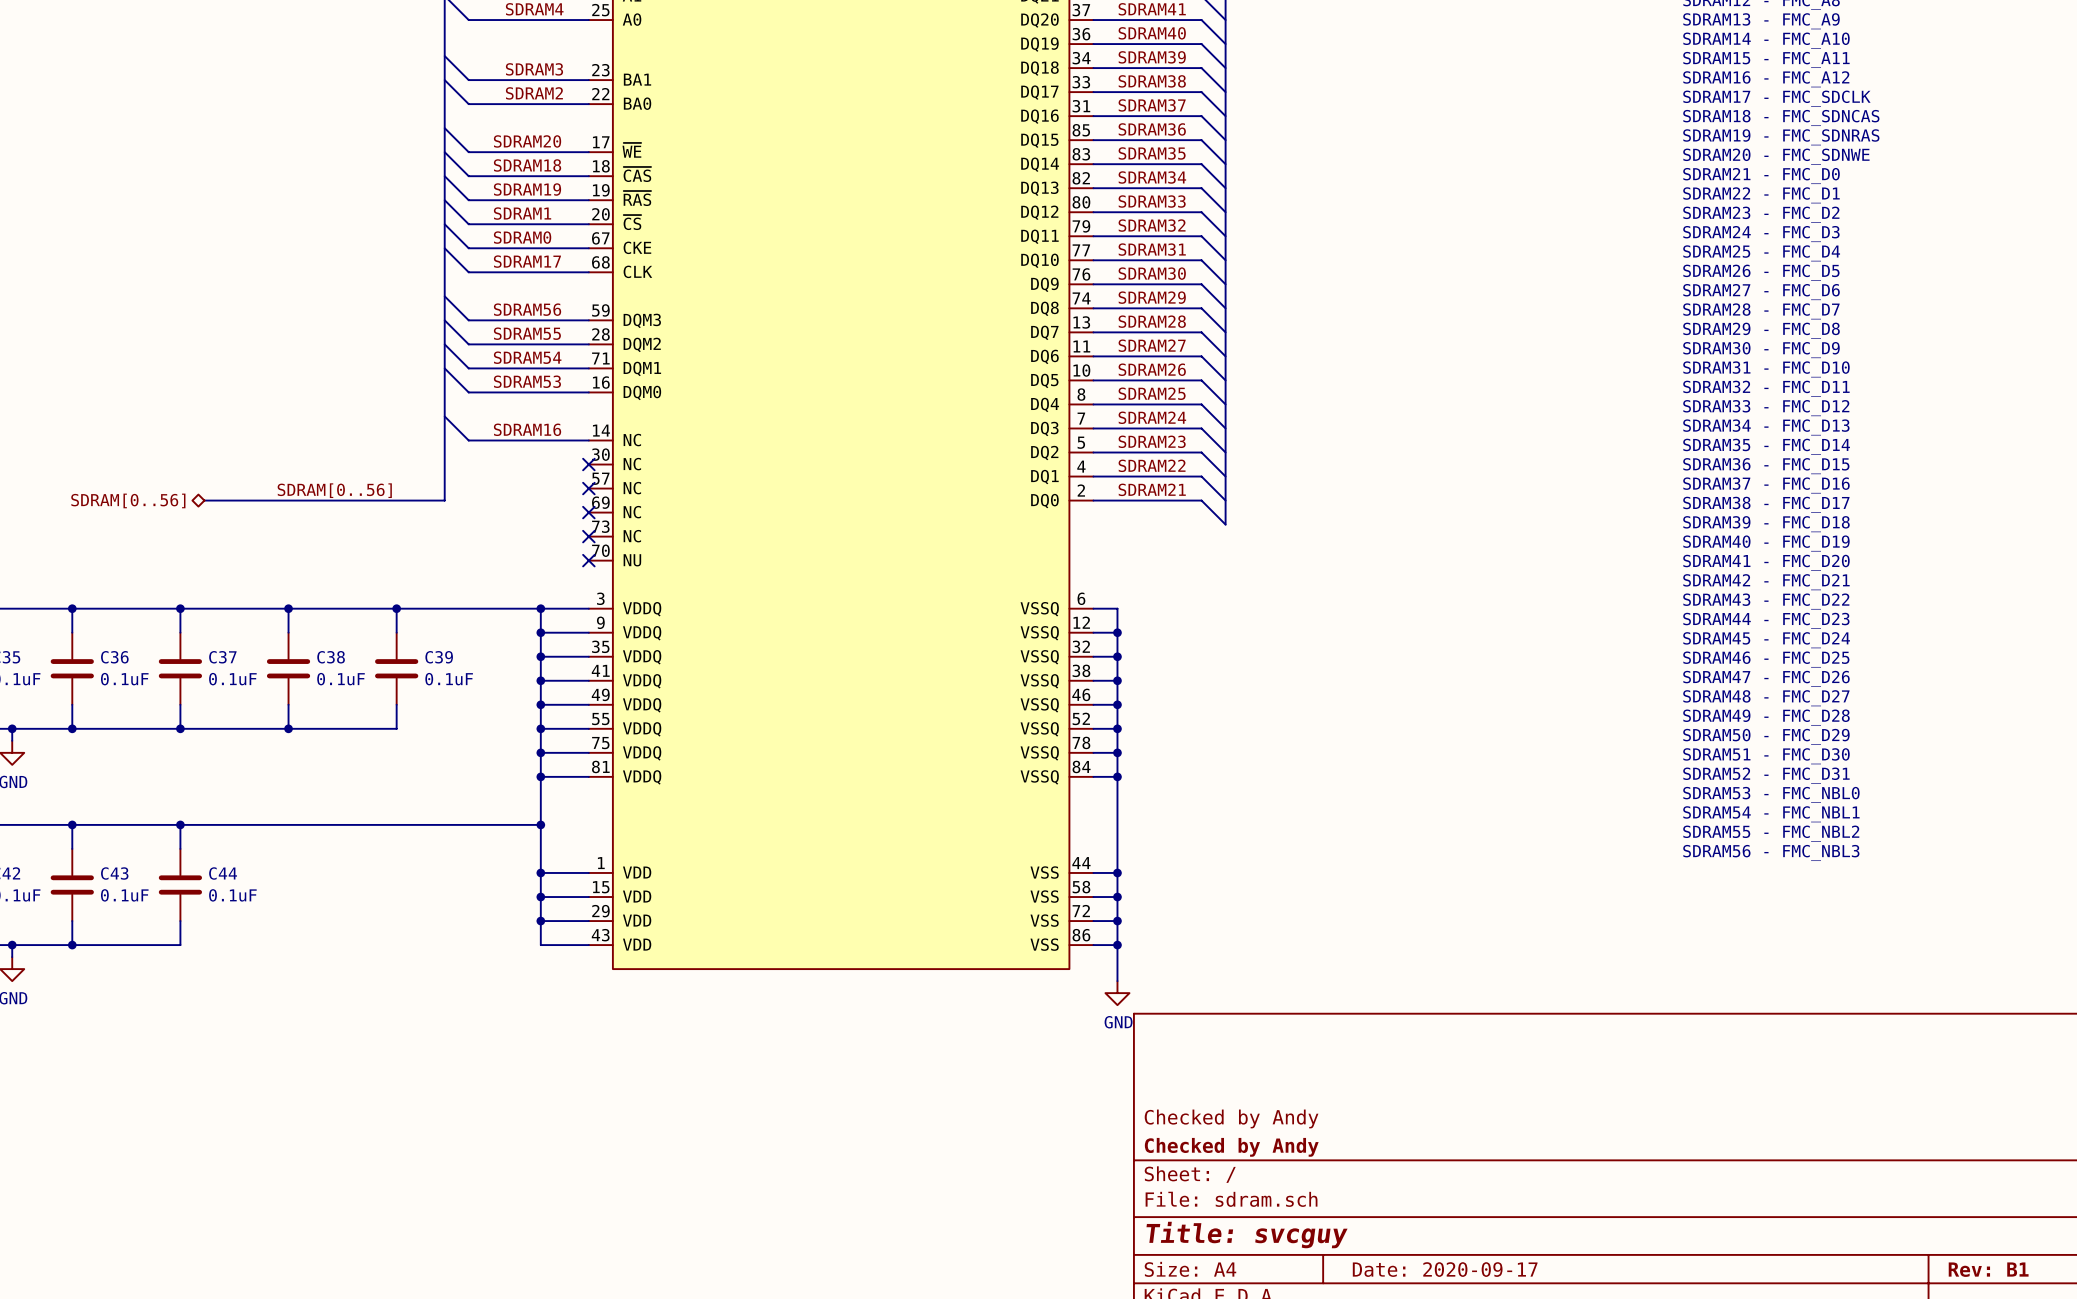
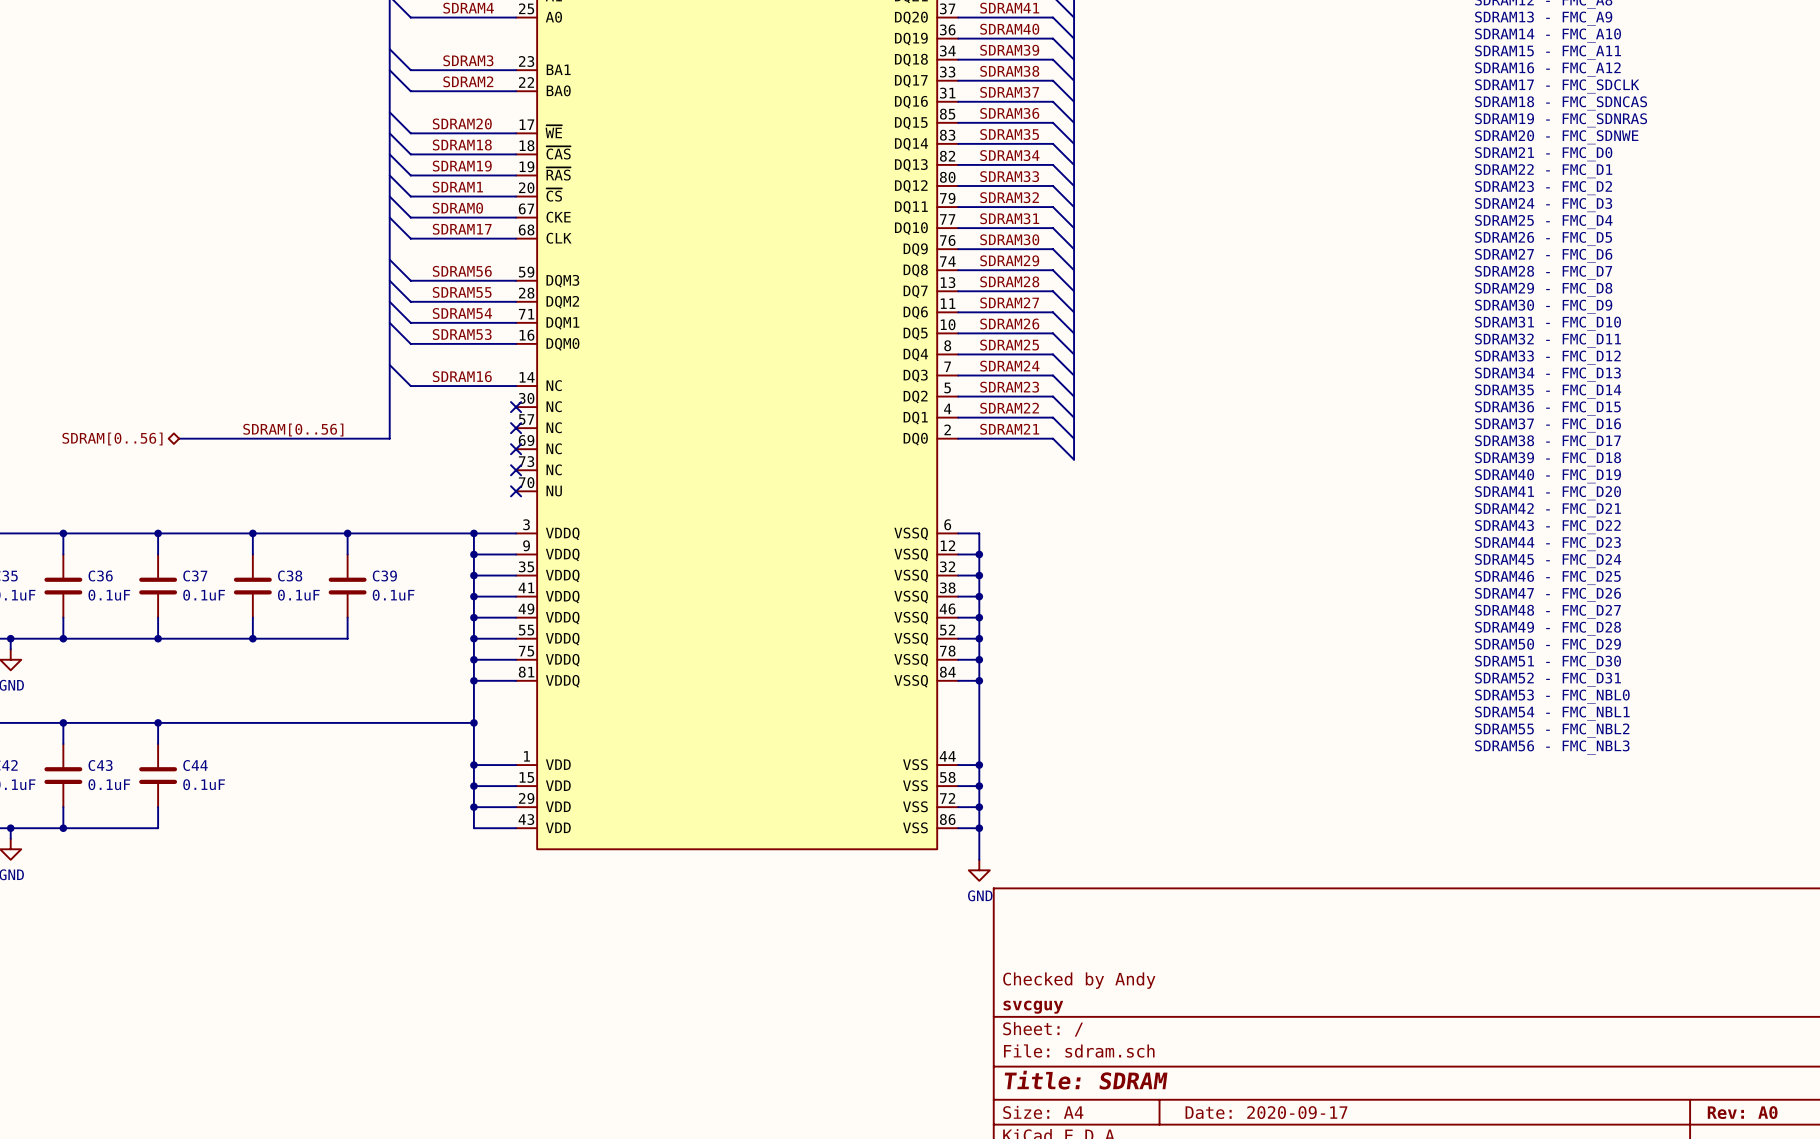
title block: Checked by Andy (1231, 1147) -> svcguy (1033, 1007)
title block: Title: svcguy (1247, 1235) -> Title: SDRAM (1086, 1080)
title block: Rev: B1 (1988, 1269) -> Rev: A0 (1742, 1112)

